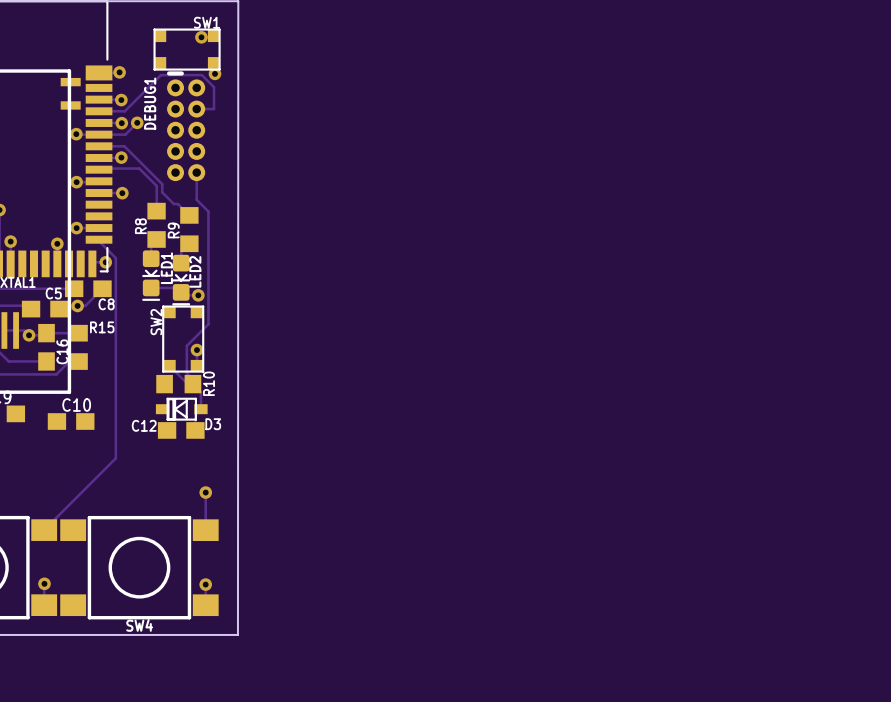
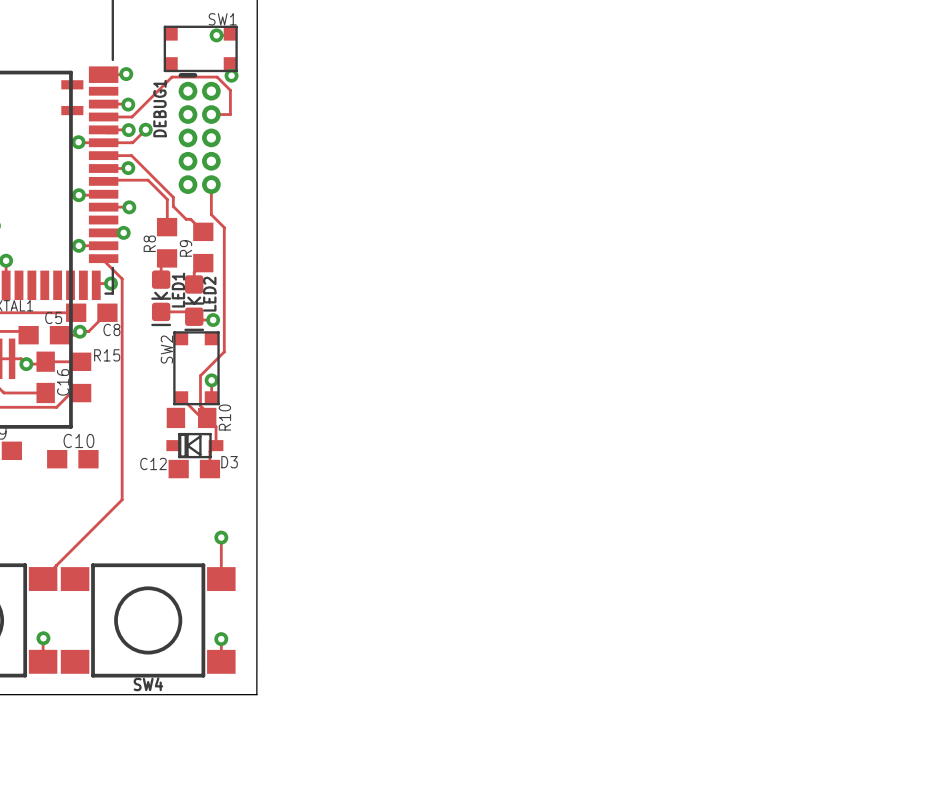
via position: (57, 243) -> (123, 232)

